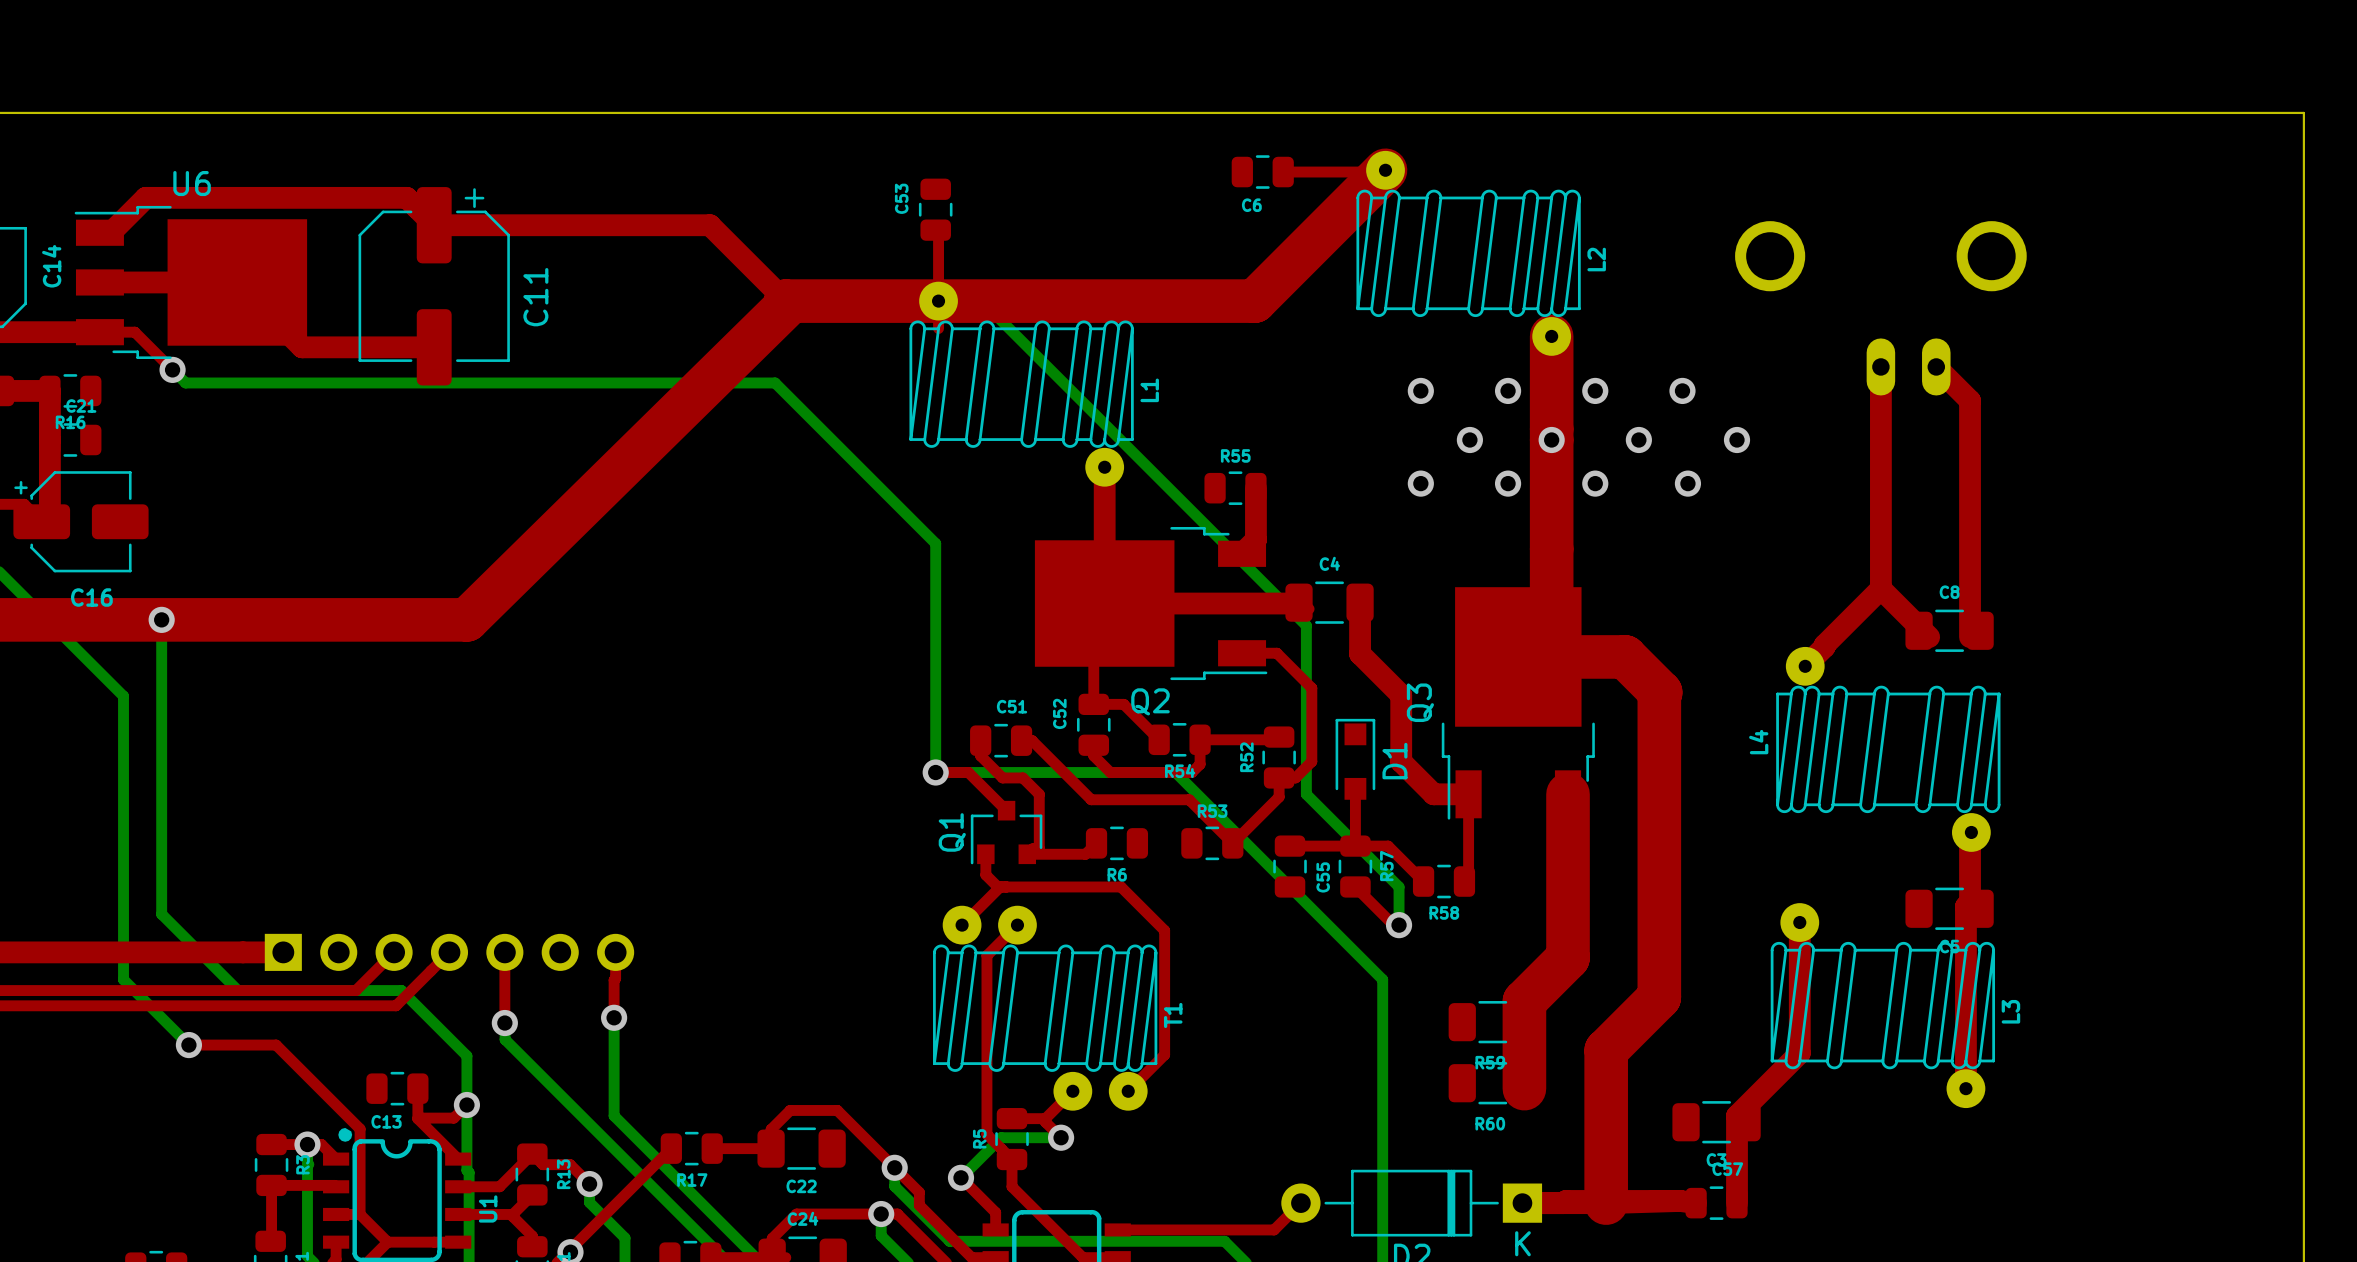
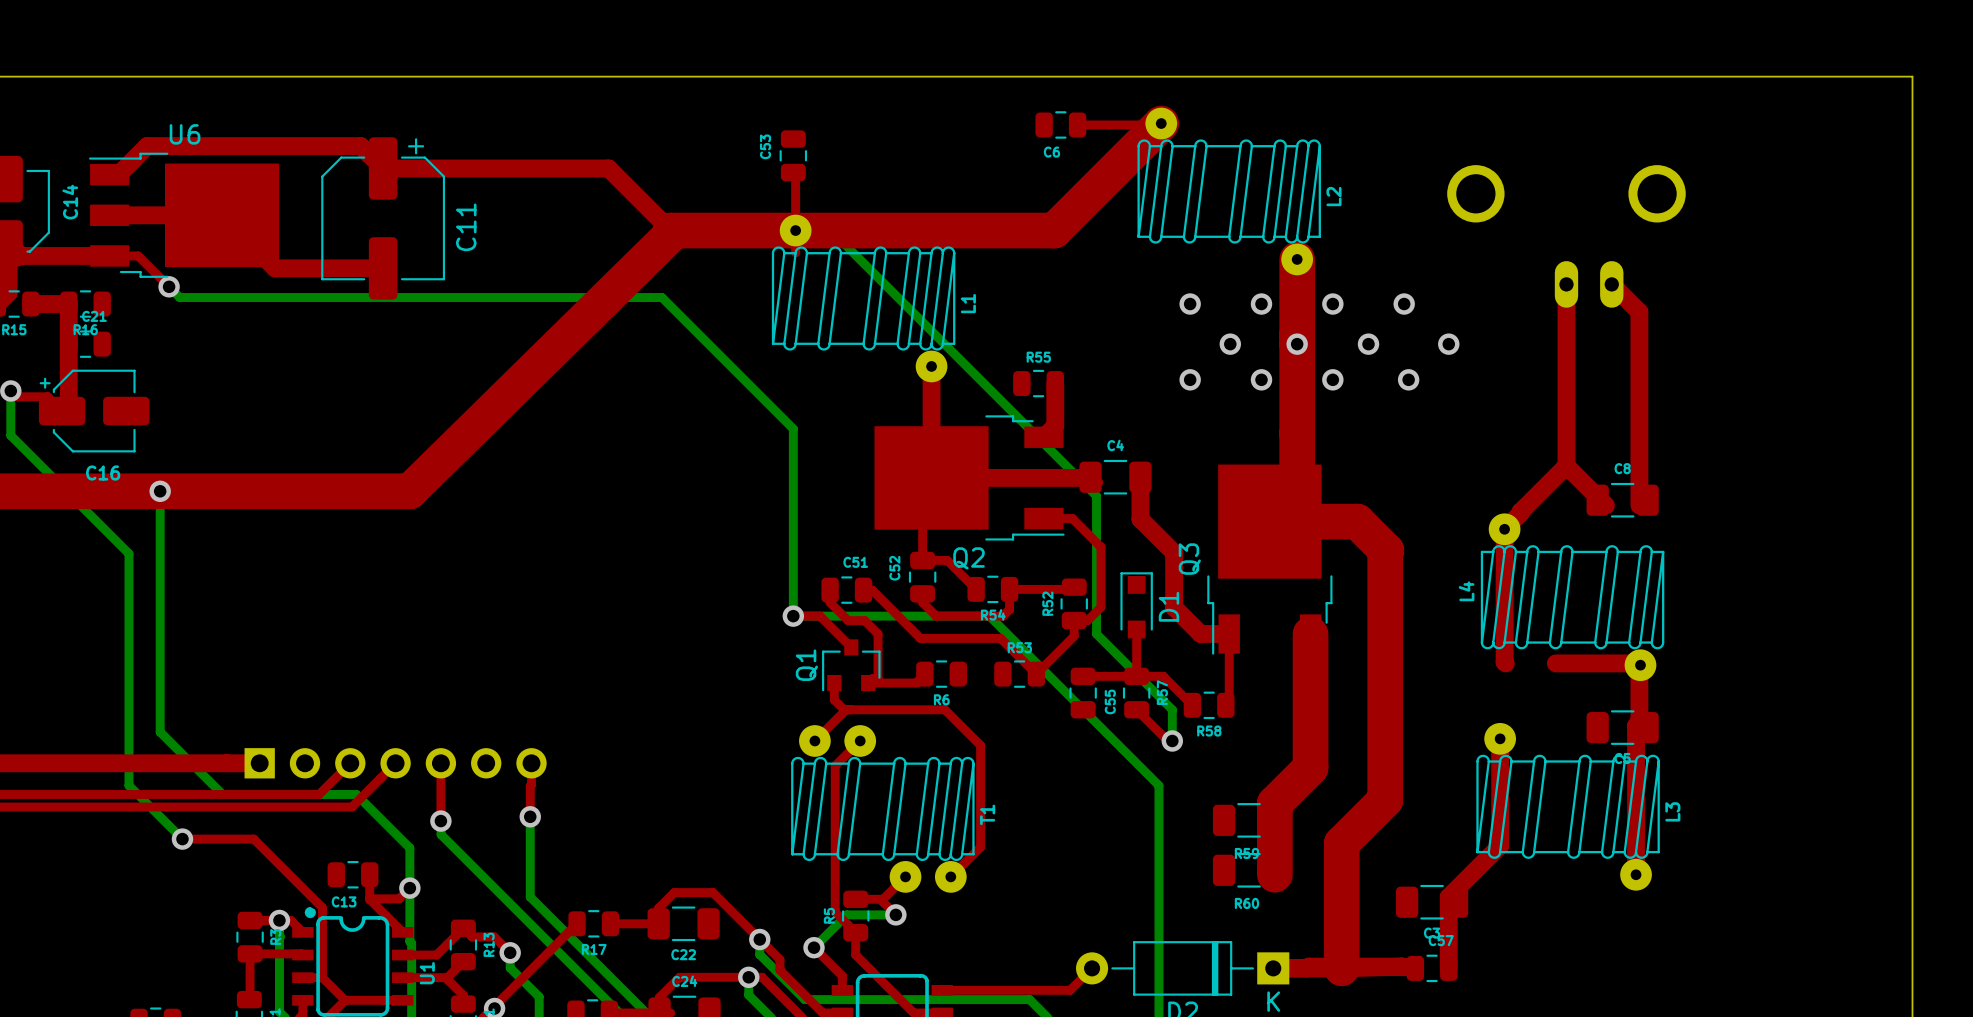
top track: none -> (1504, 529) (1505, 663)
top track: none -> (1555, 663) (1638, 663) (1640, 665)

